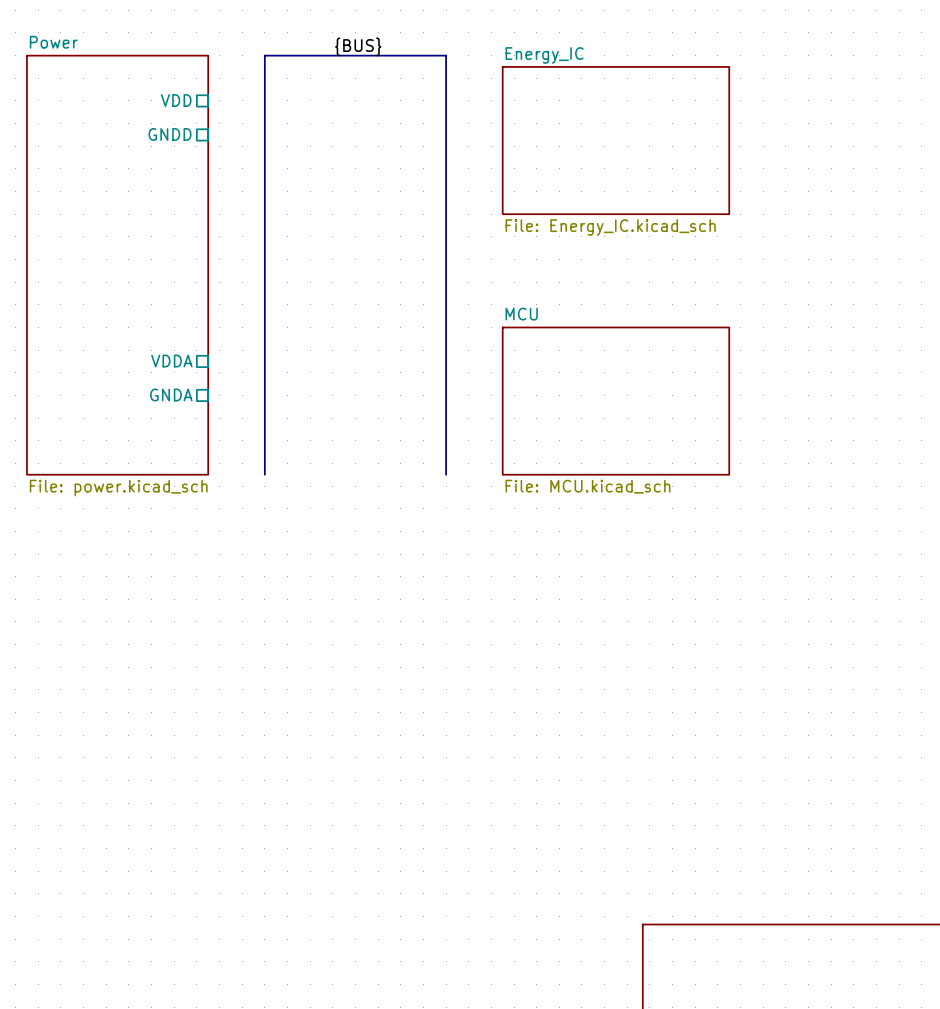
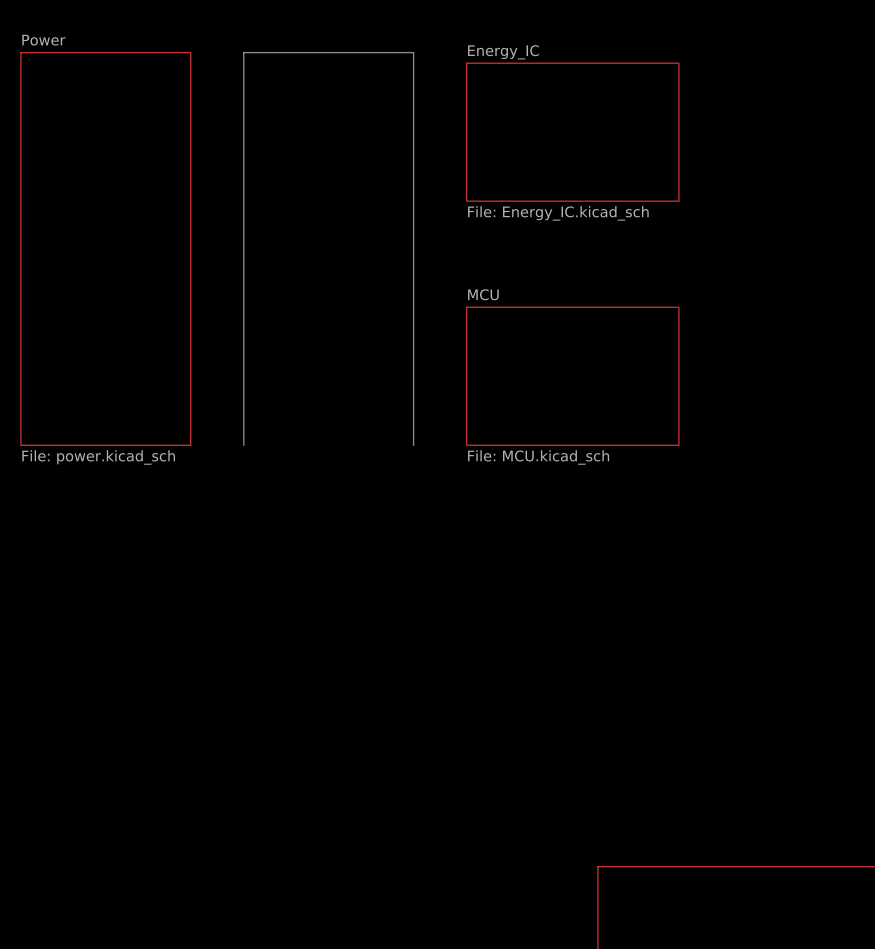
label: {BUS} (358, 46) -> none
sheet pin: VDD (176, 100) -> none
sheet pin: GNDD (170, 134) -> none
sheet pin: VDDA (171, 361) -> none
sheet pin: GNDA (171, 395) -> none

